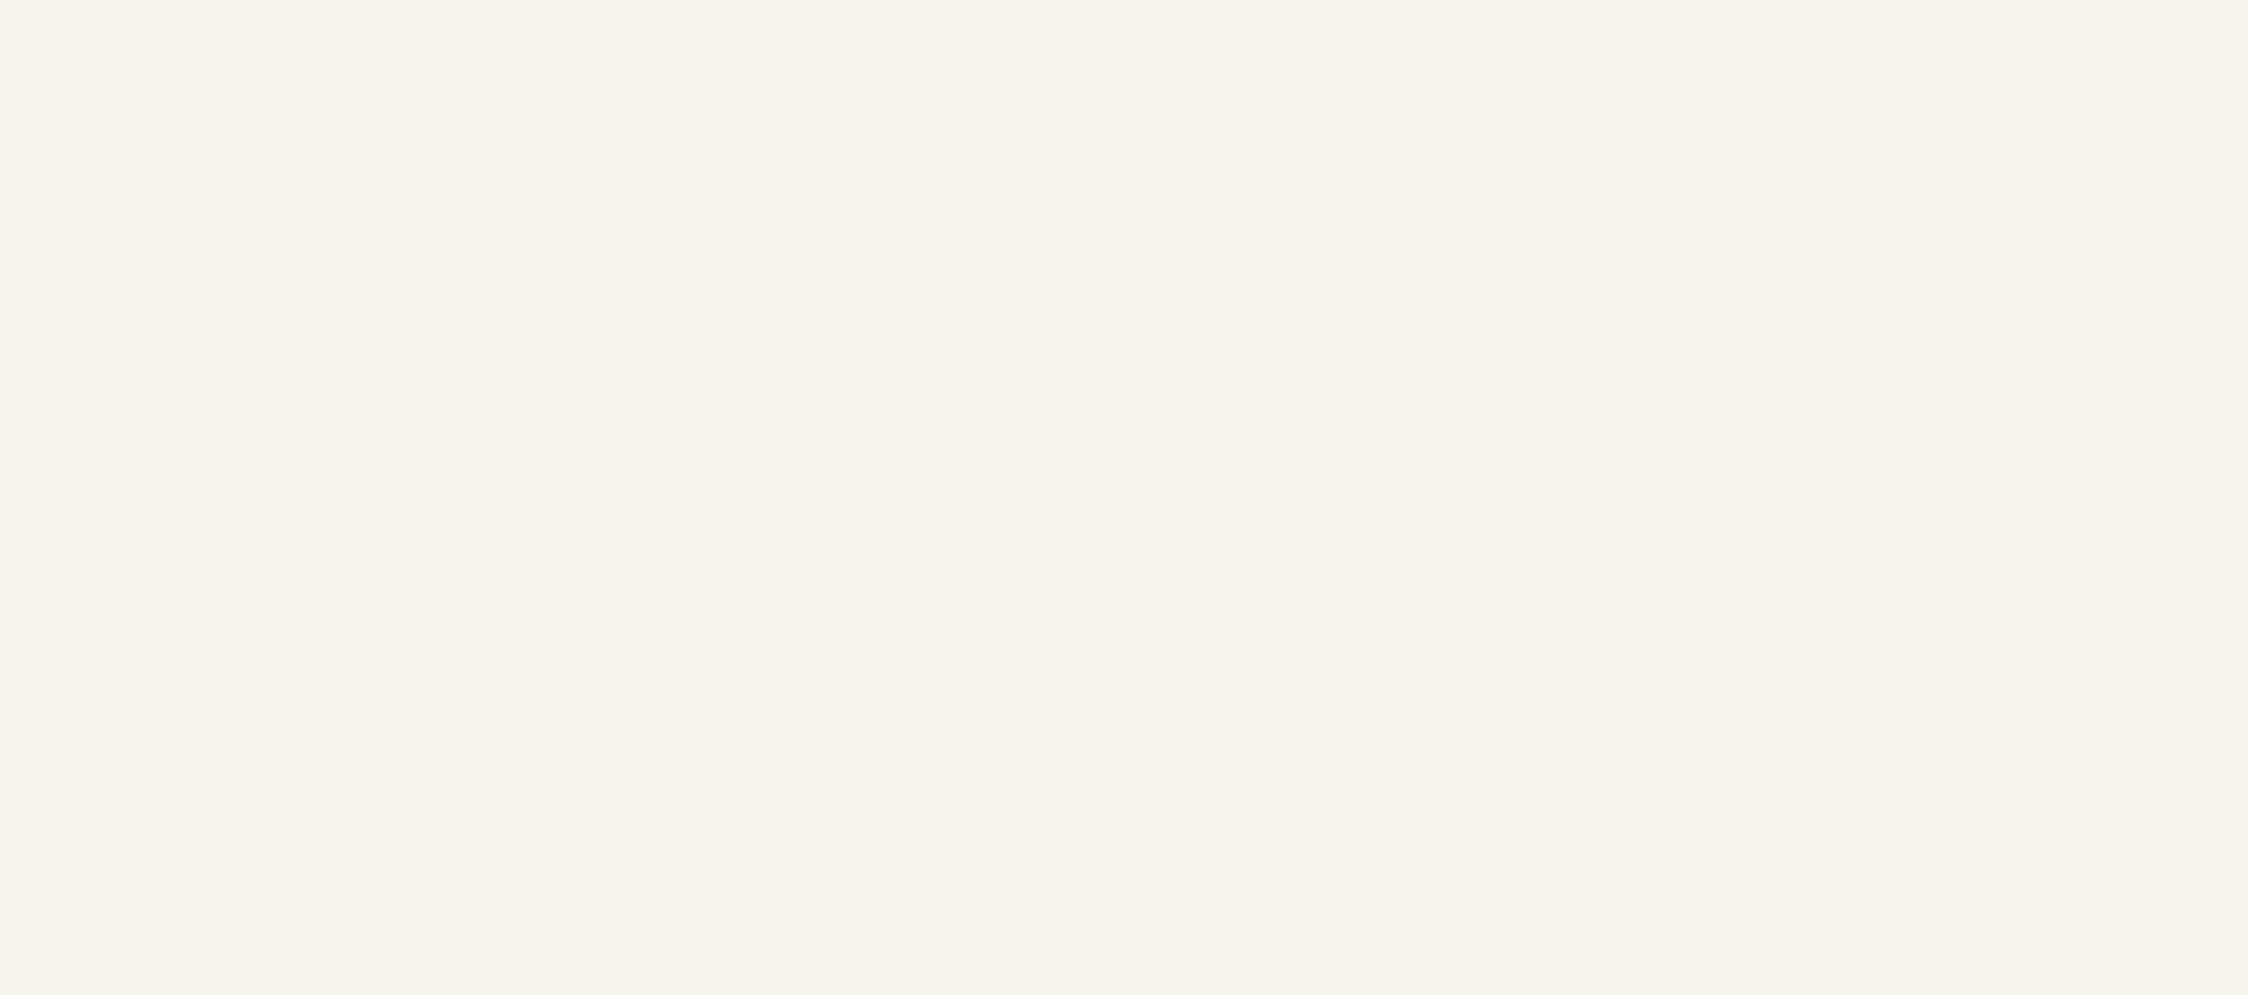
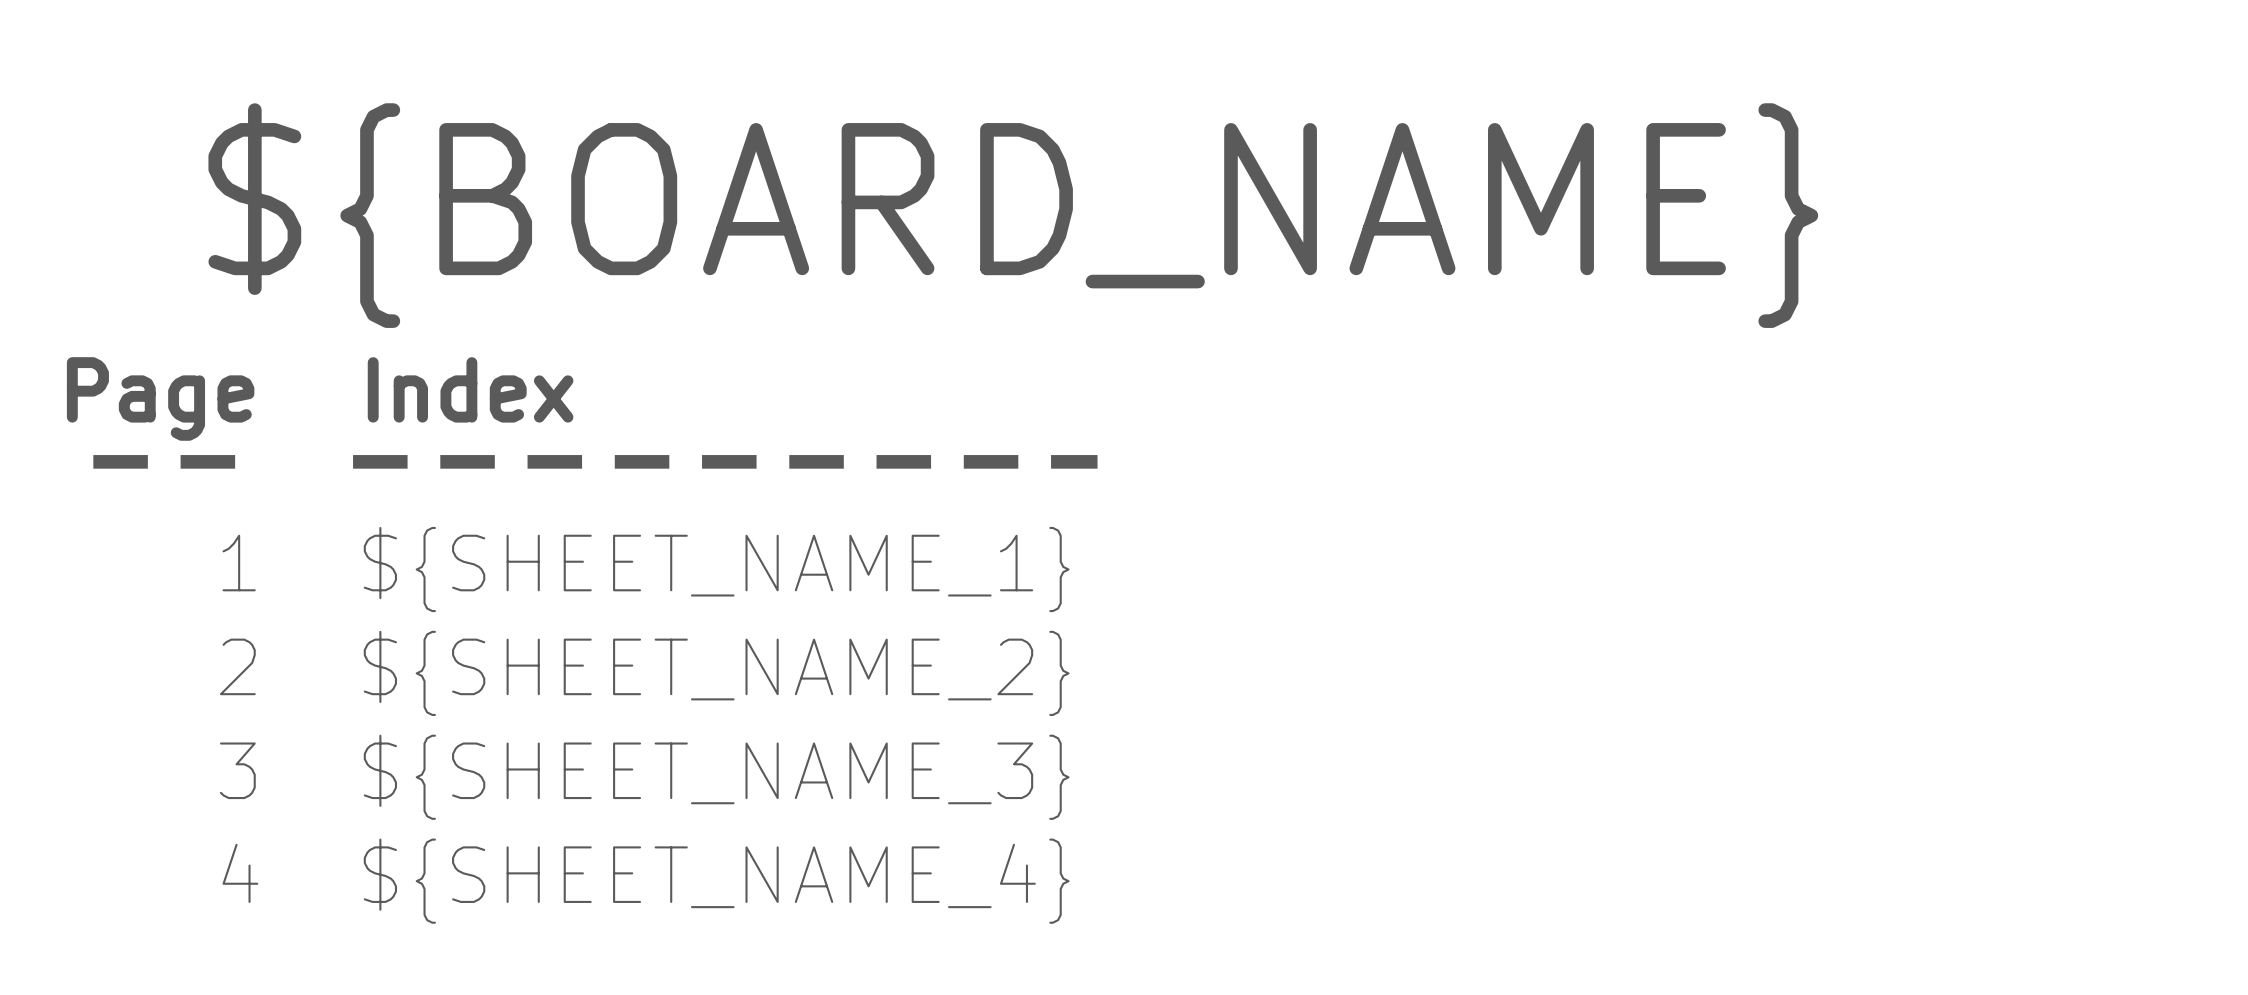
text: none -> ${BOARD_NAME} (1013, 215)
text: none -> Index (470, 389)
text: none -> Page (160, 398)
line: none -> (93, 461) (266, 461)
line: none -> (353, 461) (1097, 461)
text: none -> 1 (239, 563)
text: none -> ${SHEET_NAME_1} (716, 569)
text: none -> 2 (237, 666)
text: none -> ${SHEET_NAME_2} (716, 673)
text: none -> 3 (237, 770)
text: none -> ${SHEET_NAME_3} (716, 777)
text: none -> 4 (240, 873)
text: none -> ${SHEET_NAME_4} (716, 881)

